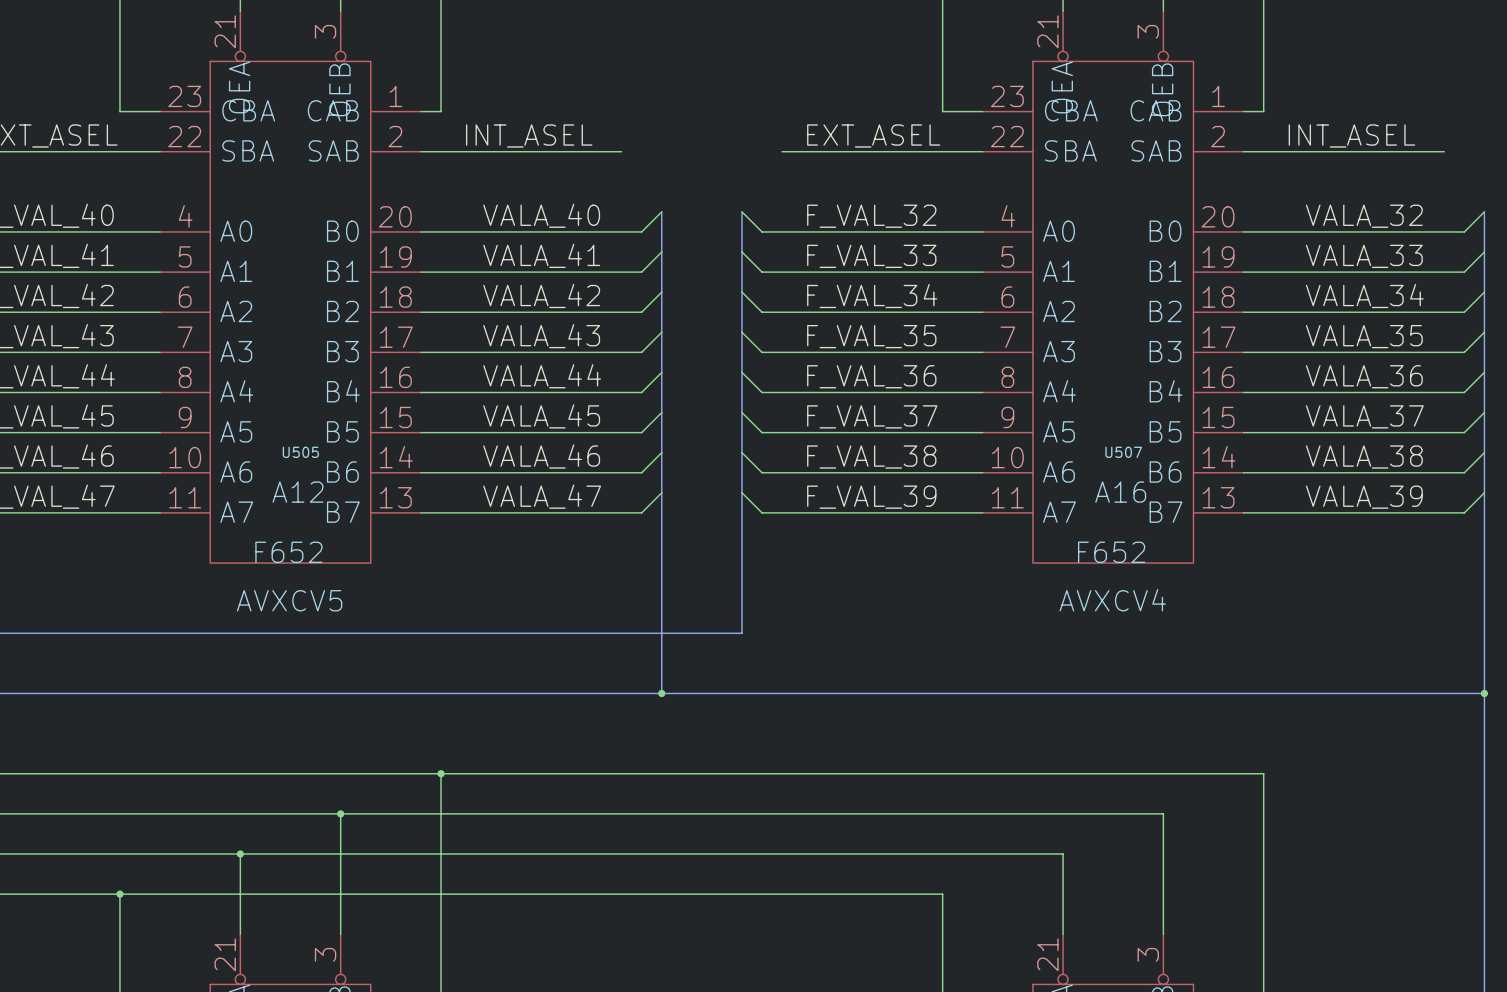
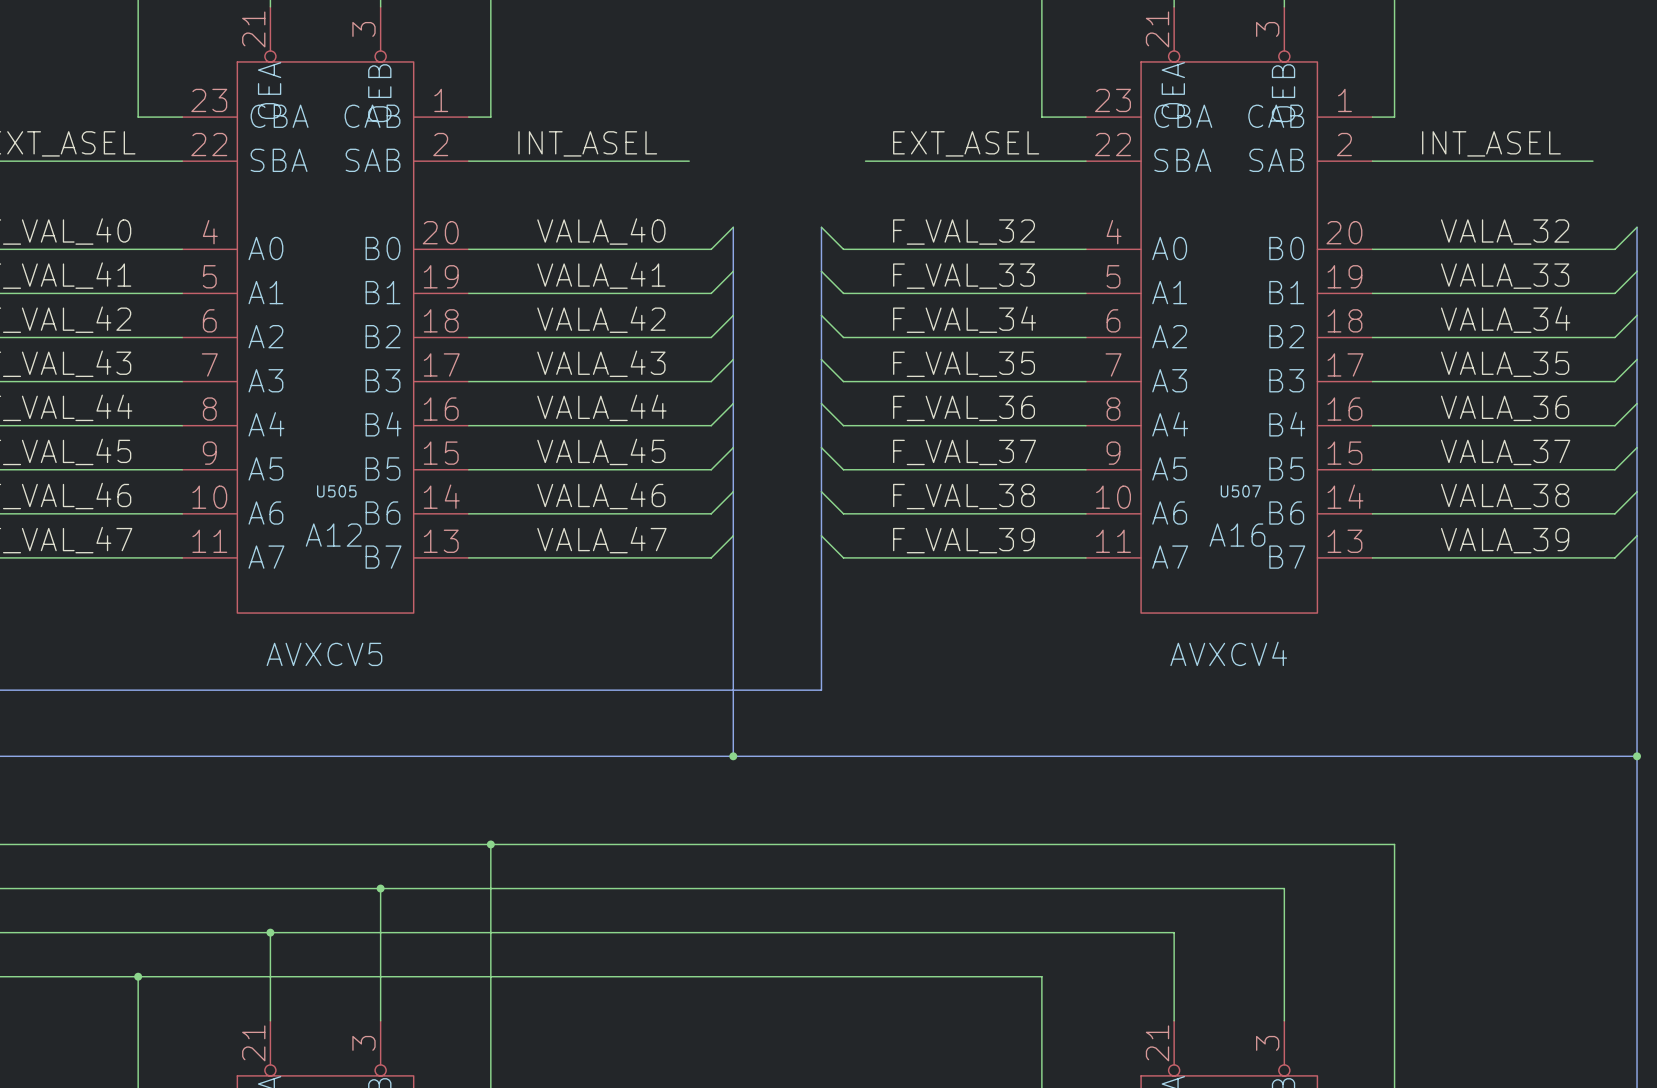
U505 value: F652 (288, 552) -> none
U507 value: F652 (1111, 552) -> none

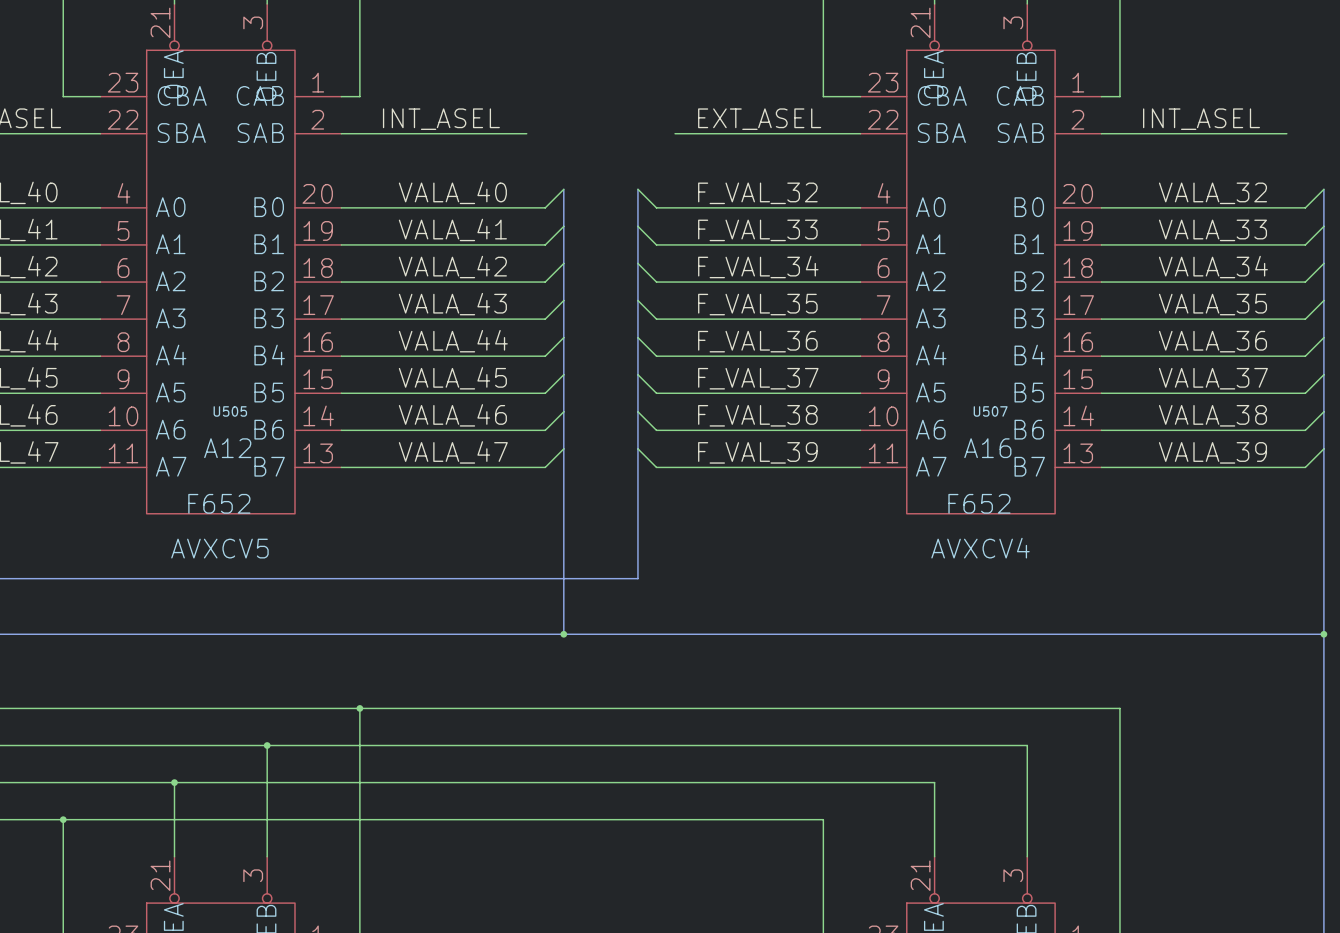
U505 value: none -> F652 (219, 503)
U507 value: none -> F652 (979, 503)

